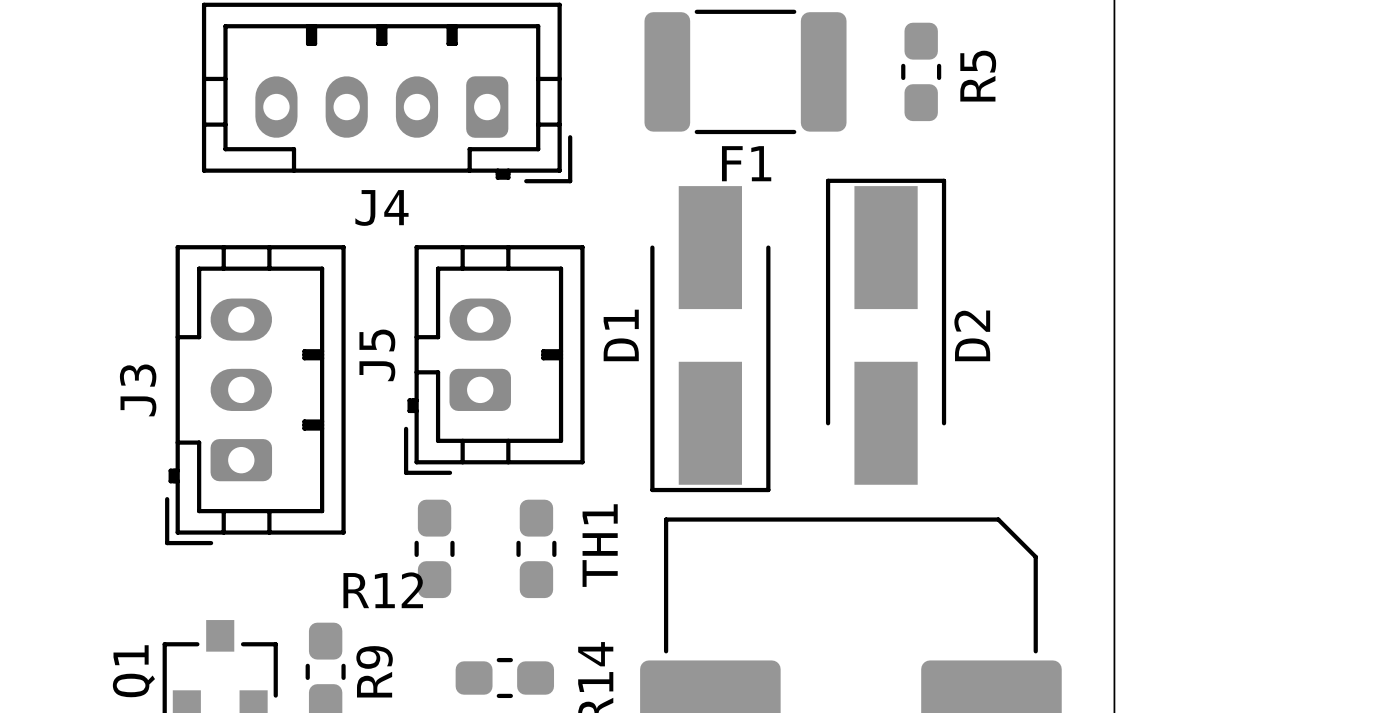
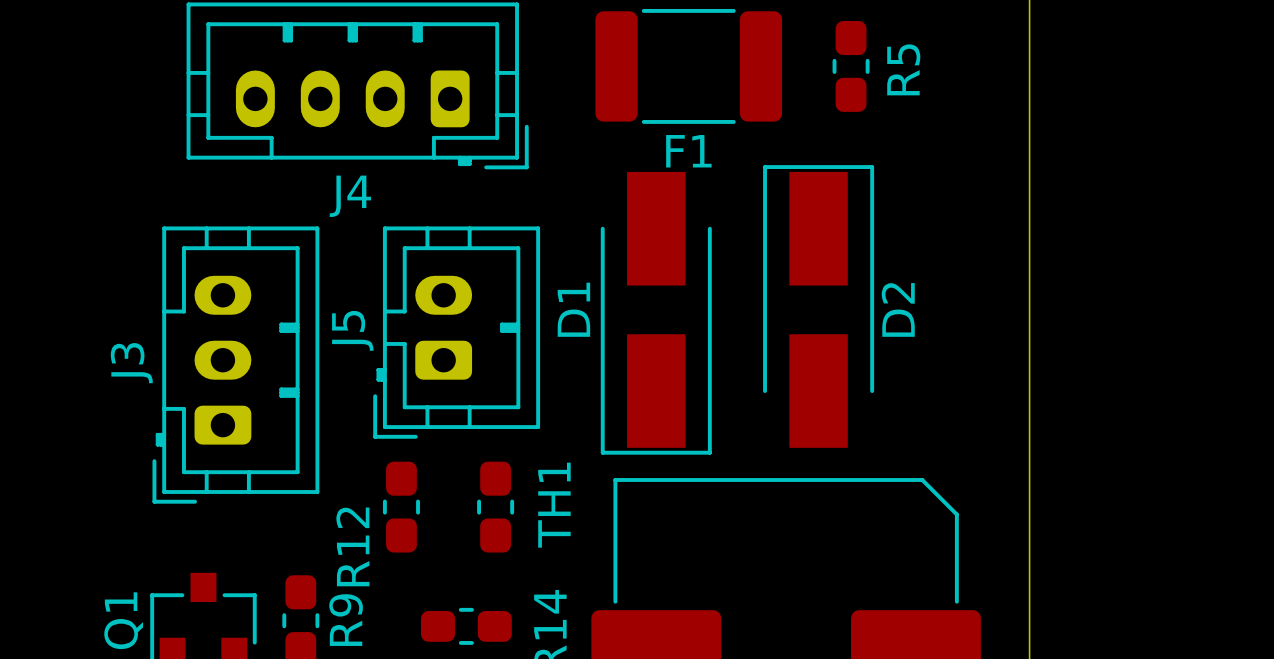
R12 name rotation: 0° (383, 590) -> 90° counterclockwise (352, 546)

